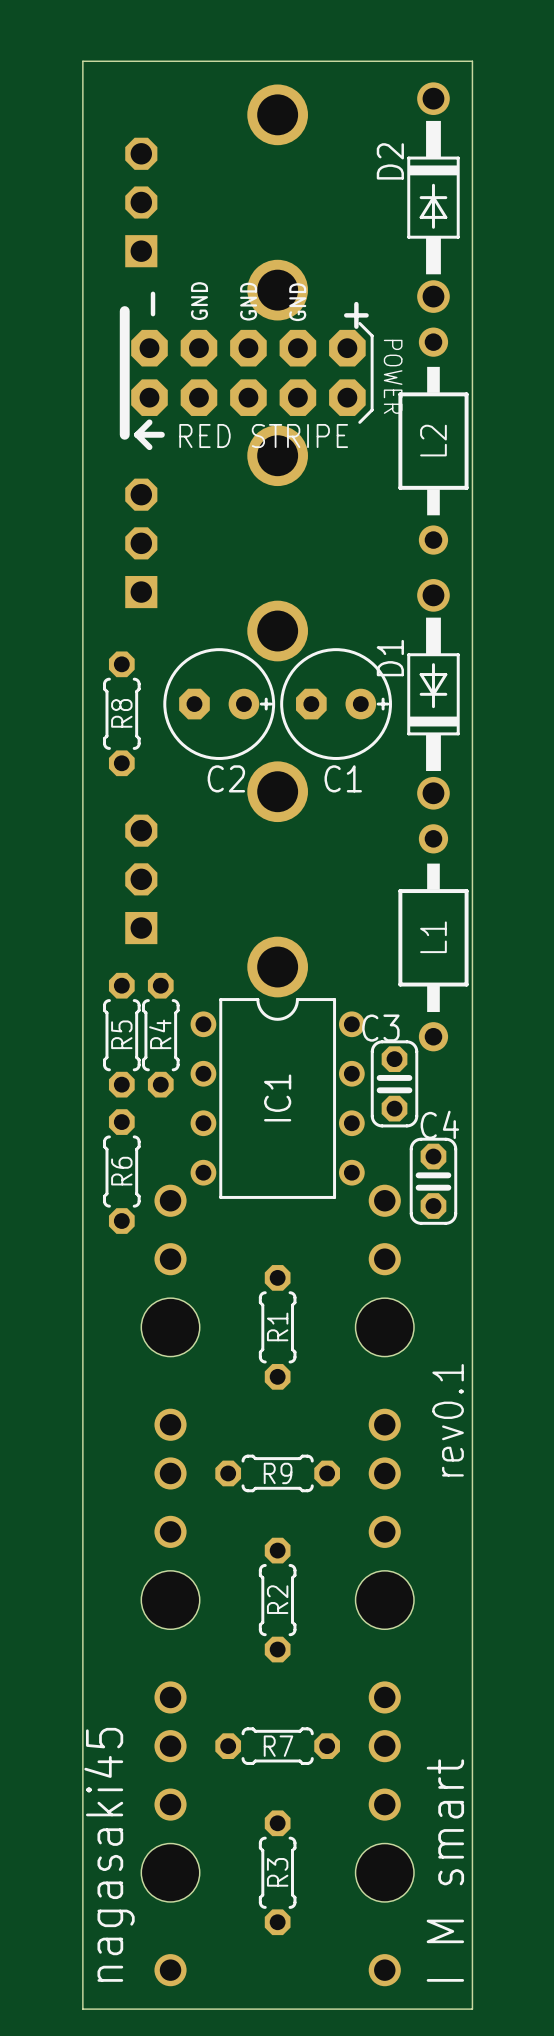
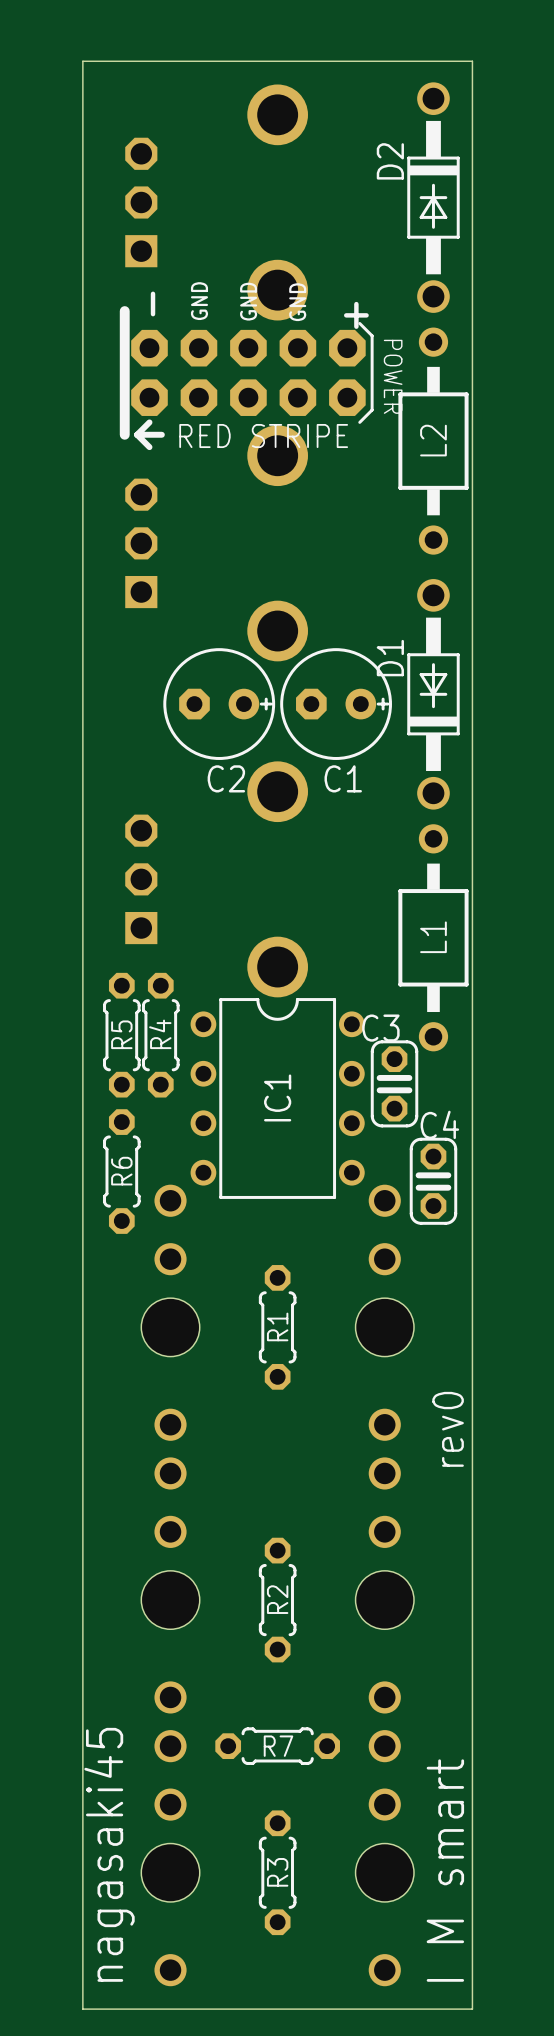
R8: (121, 713) -> none
text: rev0.1 (448, 1420) -> rev0 (448, 1429)
R9: (277, 1473) -> none

